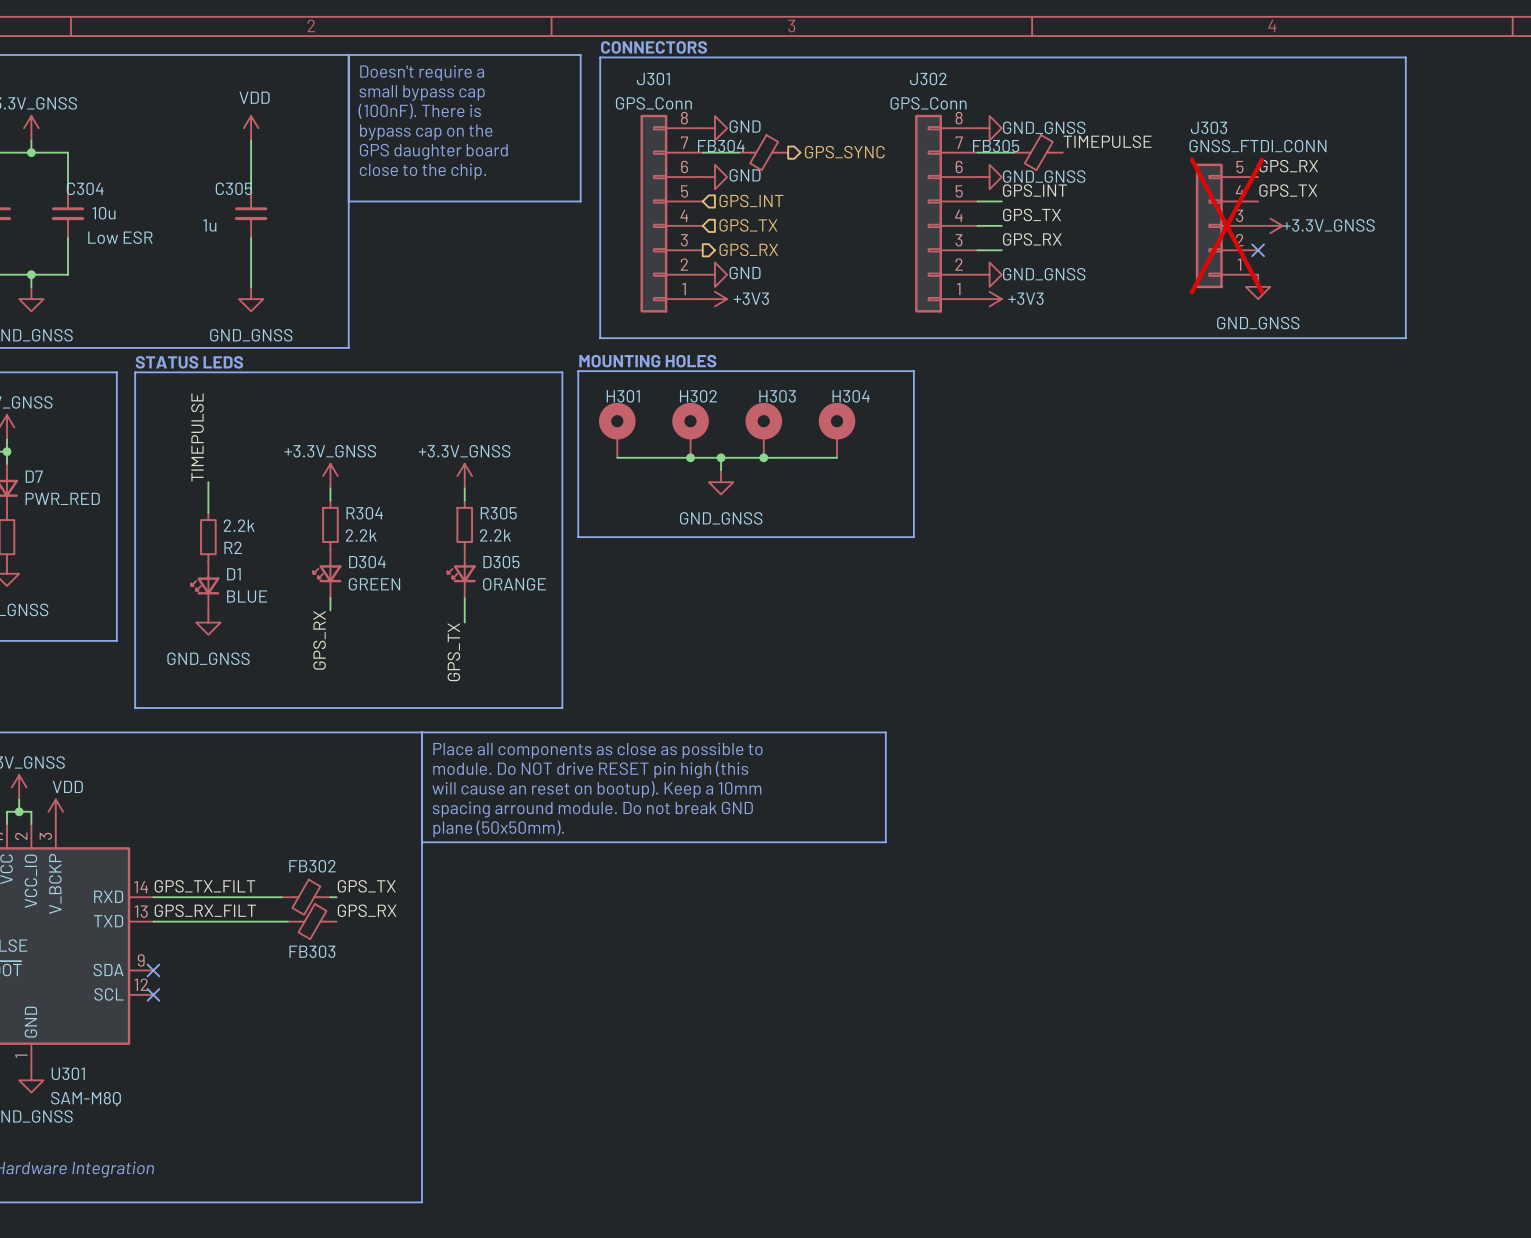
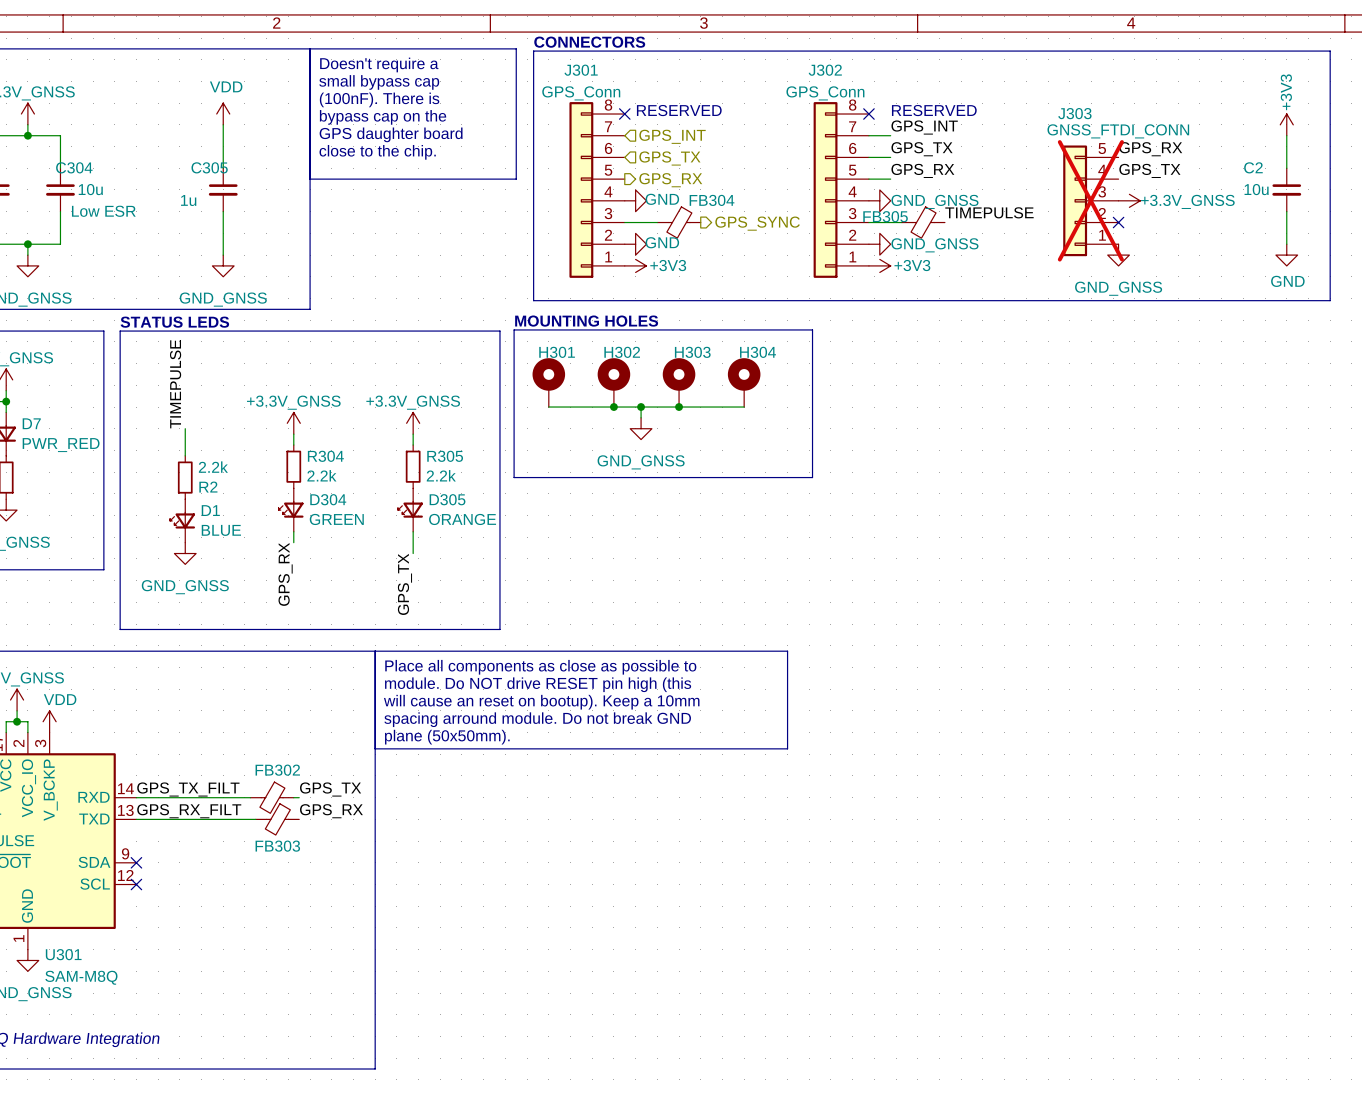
line: (1405, 57) (1405, 338) -> (1249, 51) (1330, 51) (1330, 300) (1249, 300)
text: none -> RESERVED (679, 110)
text: none -> RESERVED (934, 110)
no-connect mark: none -> (624, 114)
power symbol: GND (714, 128) -> none
no-connect mark: none -> (868, 114)
power symbol: GND_GNSS (989, 128) -> none
power symbol: none -> +3V3 (1286, 124)
label: none -> GPS_INT (924, 127)
label position: TIMEPULSE (1107, 141) -> TIMEPULSE (989, 212)
FB304 name position: FB304 (721, 146) -> FB304 (712, 200)
wire: (702, 152) (739, 152) -> (624, 222) (657, 222)
hierarchical label: none -> GPS_INT (672, 136)
FB304 position: (763, 152) -> (679, 222)
hierarchical label position: GPS_SYNC (844, 152) -> GPS_SYNC (757, 223)
wire: (1001, 152) (1014, 152) -> (890, 222) (901, 222)
FB305 position: (1038, 152) -> (923, 222)
wire: none -> (1286, 135) (1286, 168)
power symbol: GND (714, 177) -> none
power symbol: GND_GNSS (989, 177) -> none
label: GPS_INT (1034, 190) -> GPS_RX (922, 170)
hierarchical label shape: input (751, 201) -> output (670, 180)
hierarchical label: GPS_INT (751, 201) -> GPS_RX (670, 180)
C2: none -> 10u (1286, 189)
label position: GPS_TX (1032, 214) -> GPS_TX (922, 149)
power symbol: none -> GND (635, 200)
hierarchical label position: GPS_TX (748, 225) -> GPS_TX (669, 158)
power symbol: none -> GND_GNSS (879, 200)
wire: none -> (1286, 211) (1286, 244)
label: GPS_RX (1032, 239) -> none
hierarchical label: GPS_RX (748, 249) -> none
power symbol: none -> GND (1286, 255)

